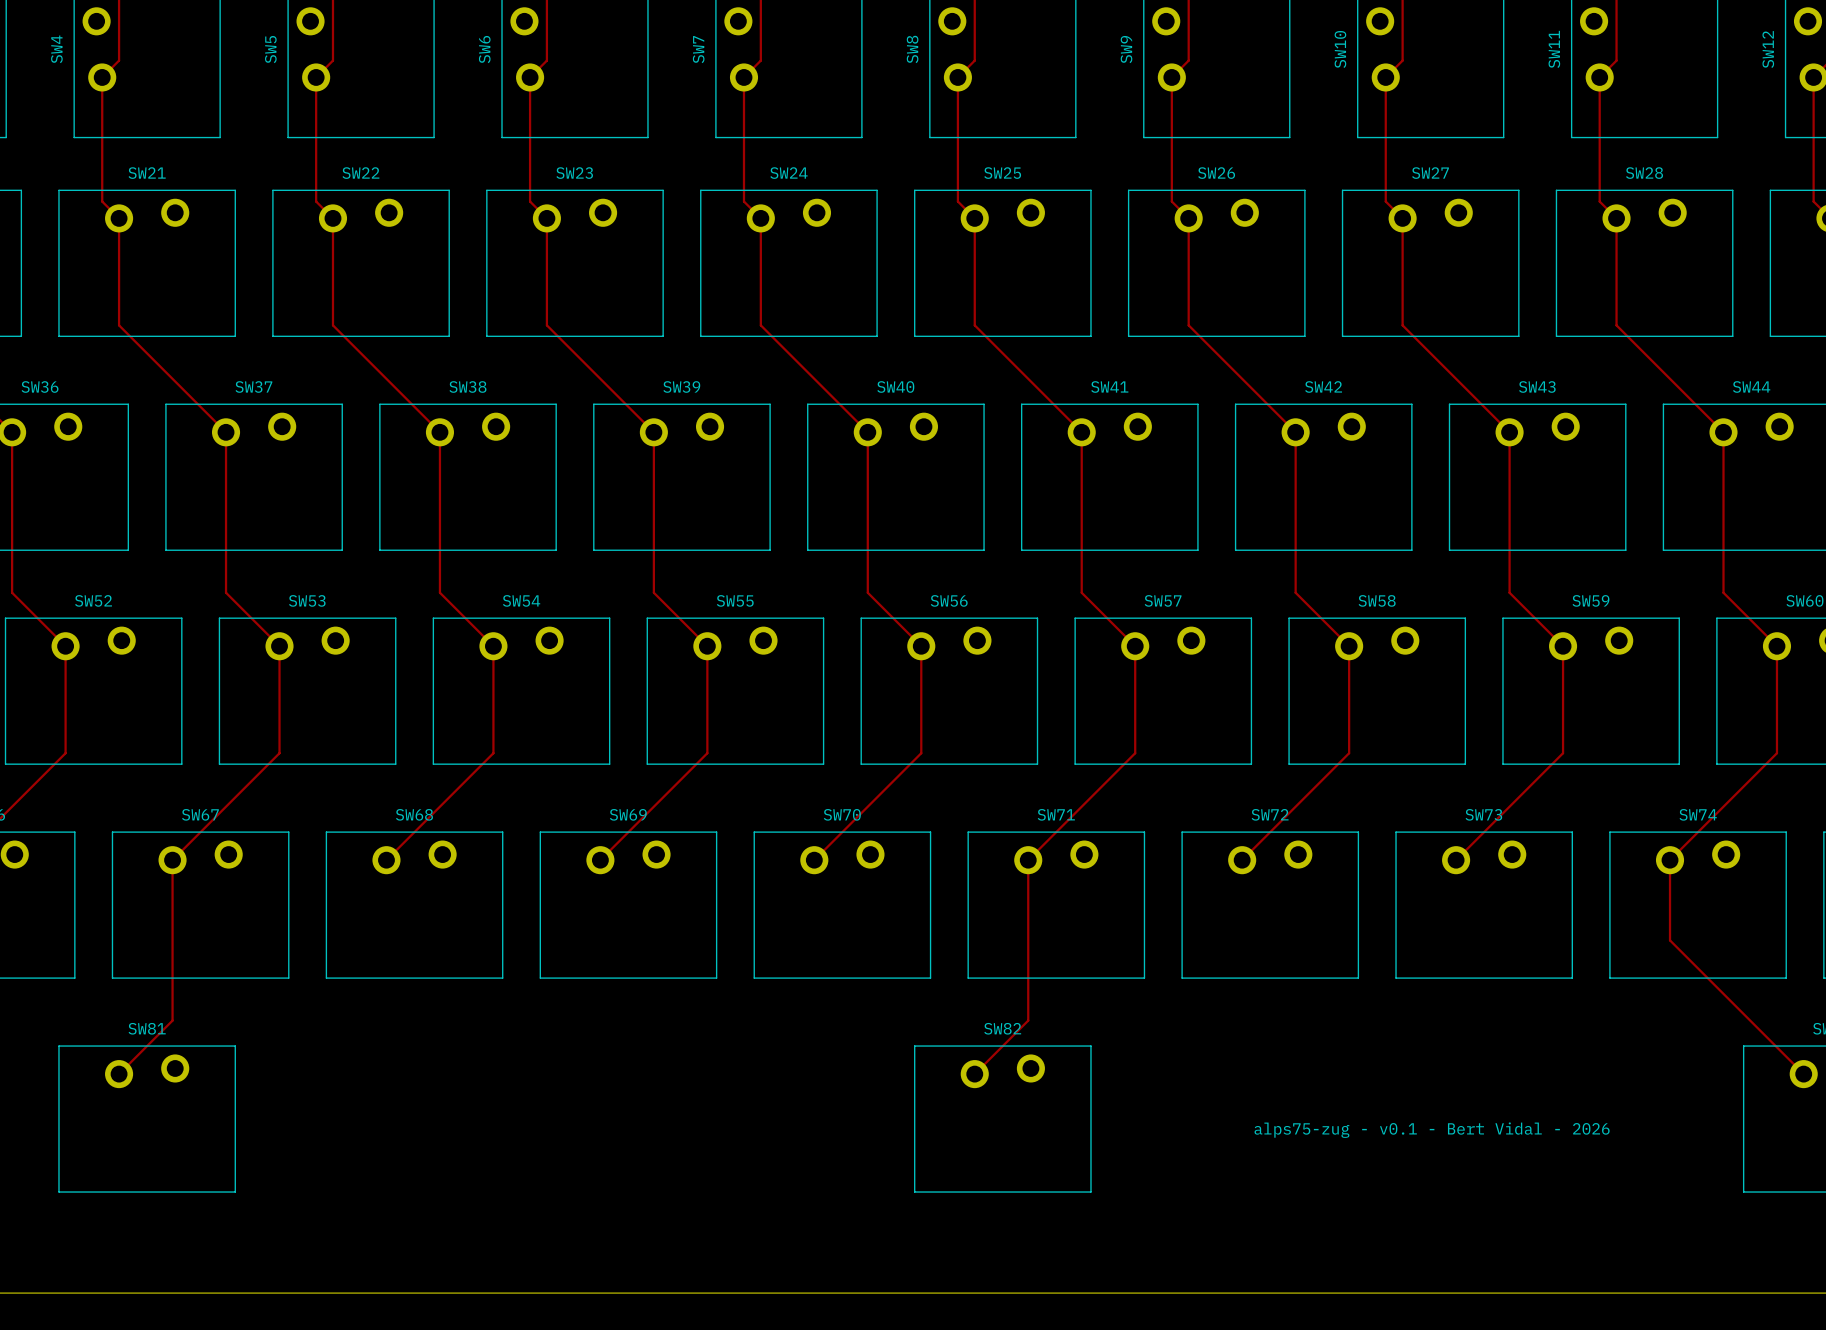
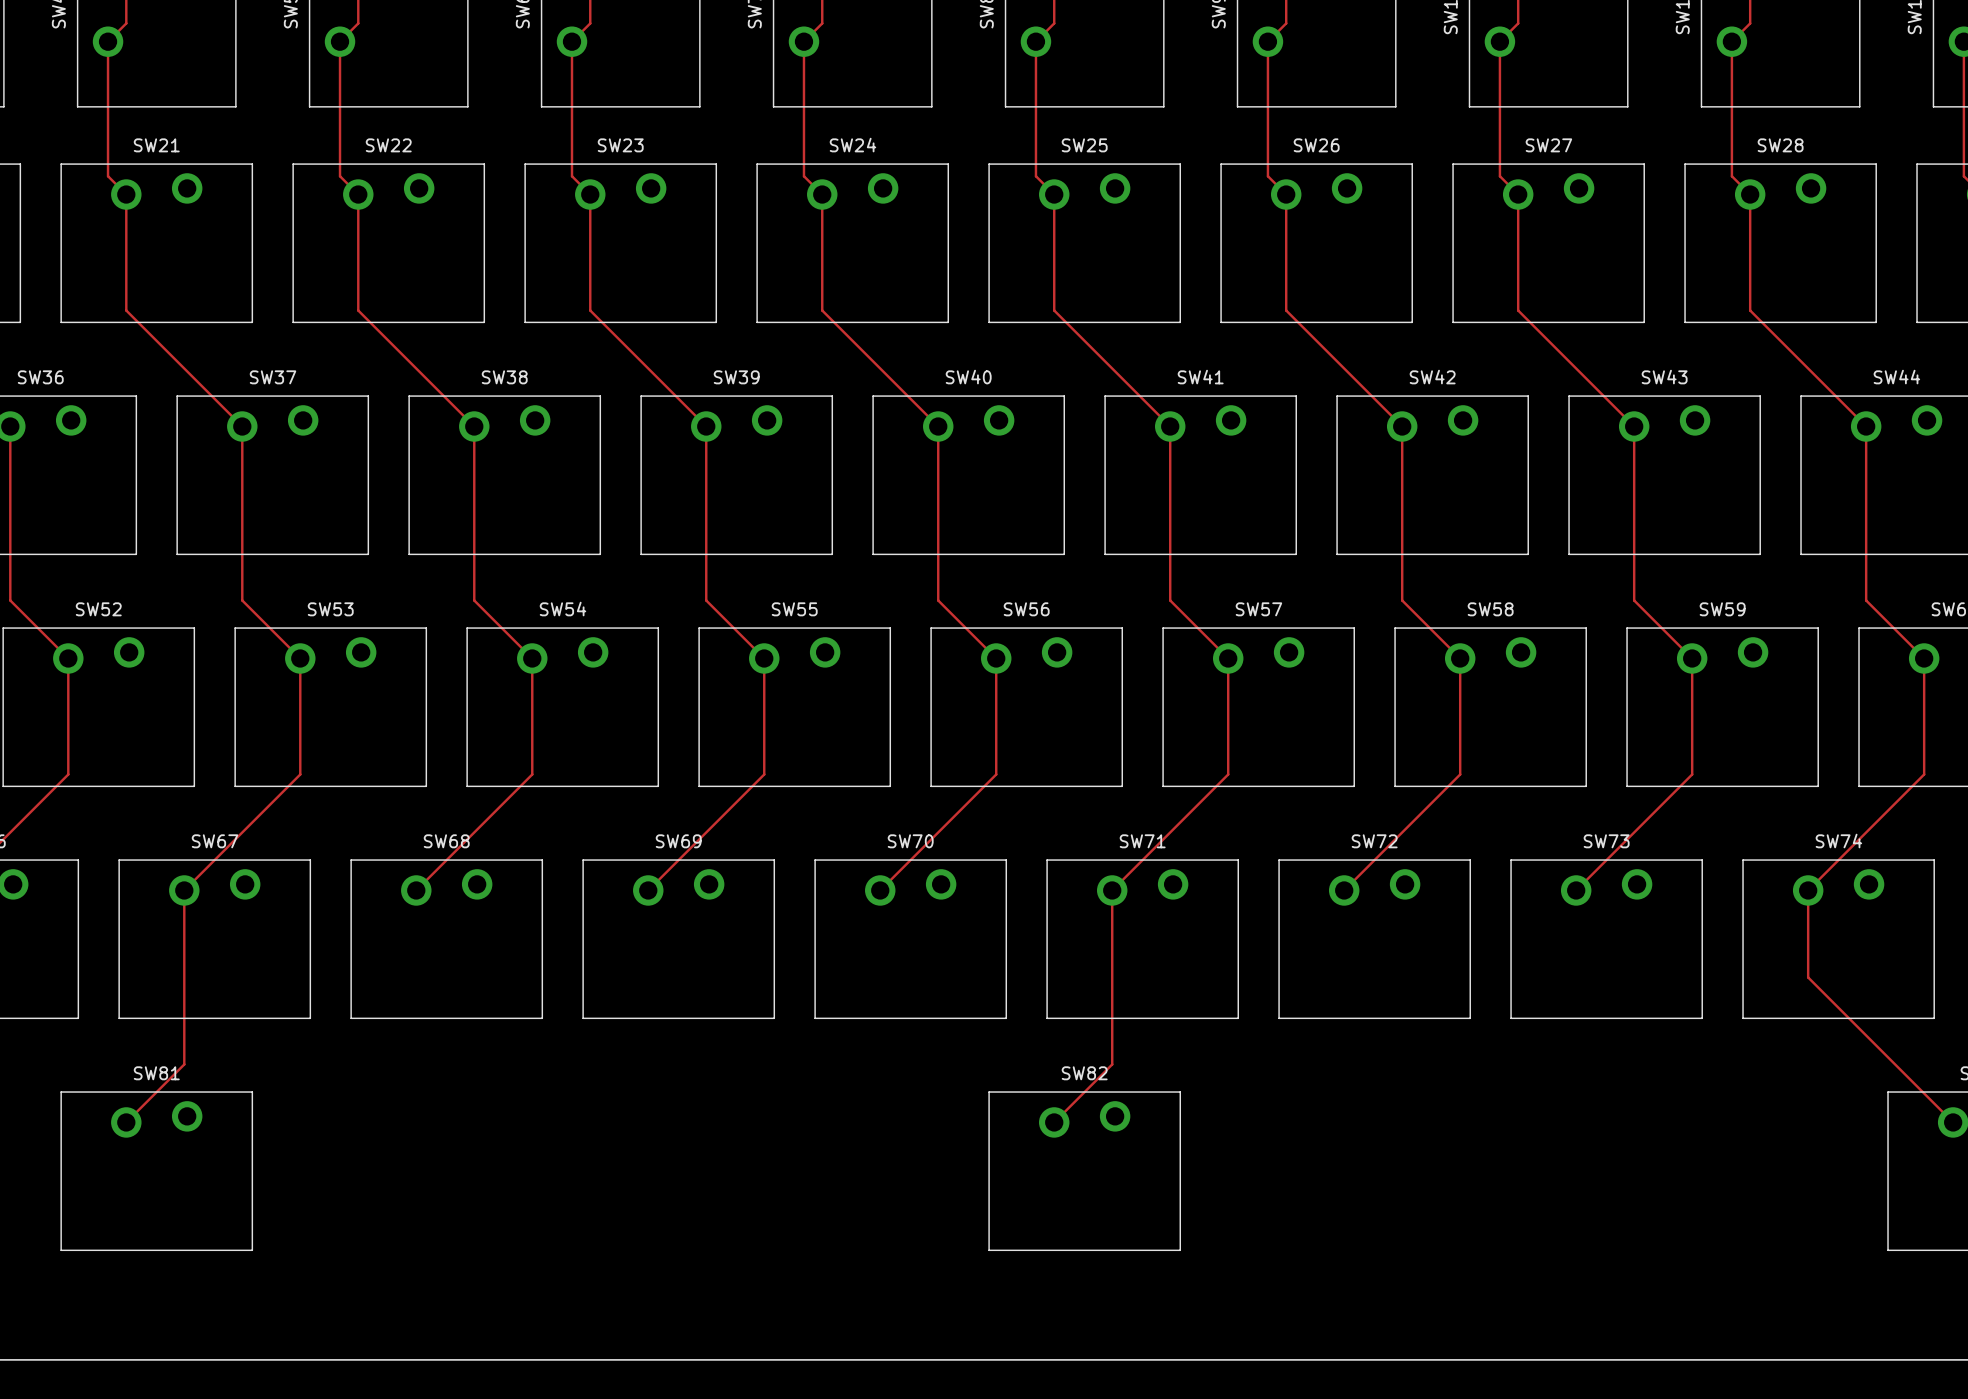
text: alps75-zug - v0.1 - Bert Vidal - 2026 (1432, 1130) -> none

